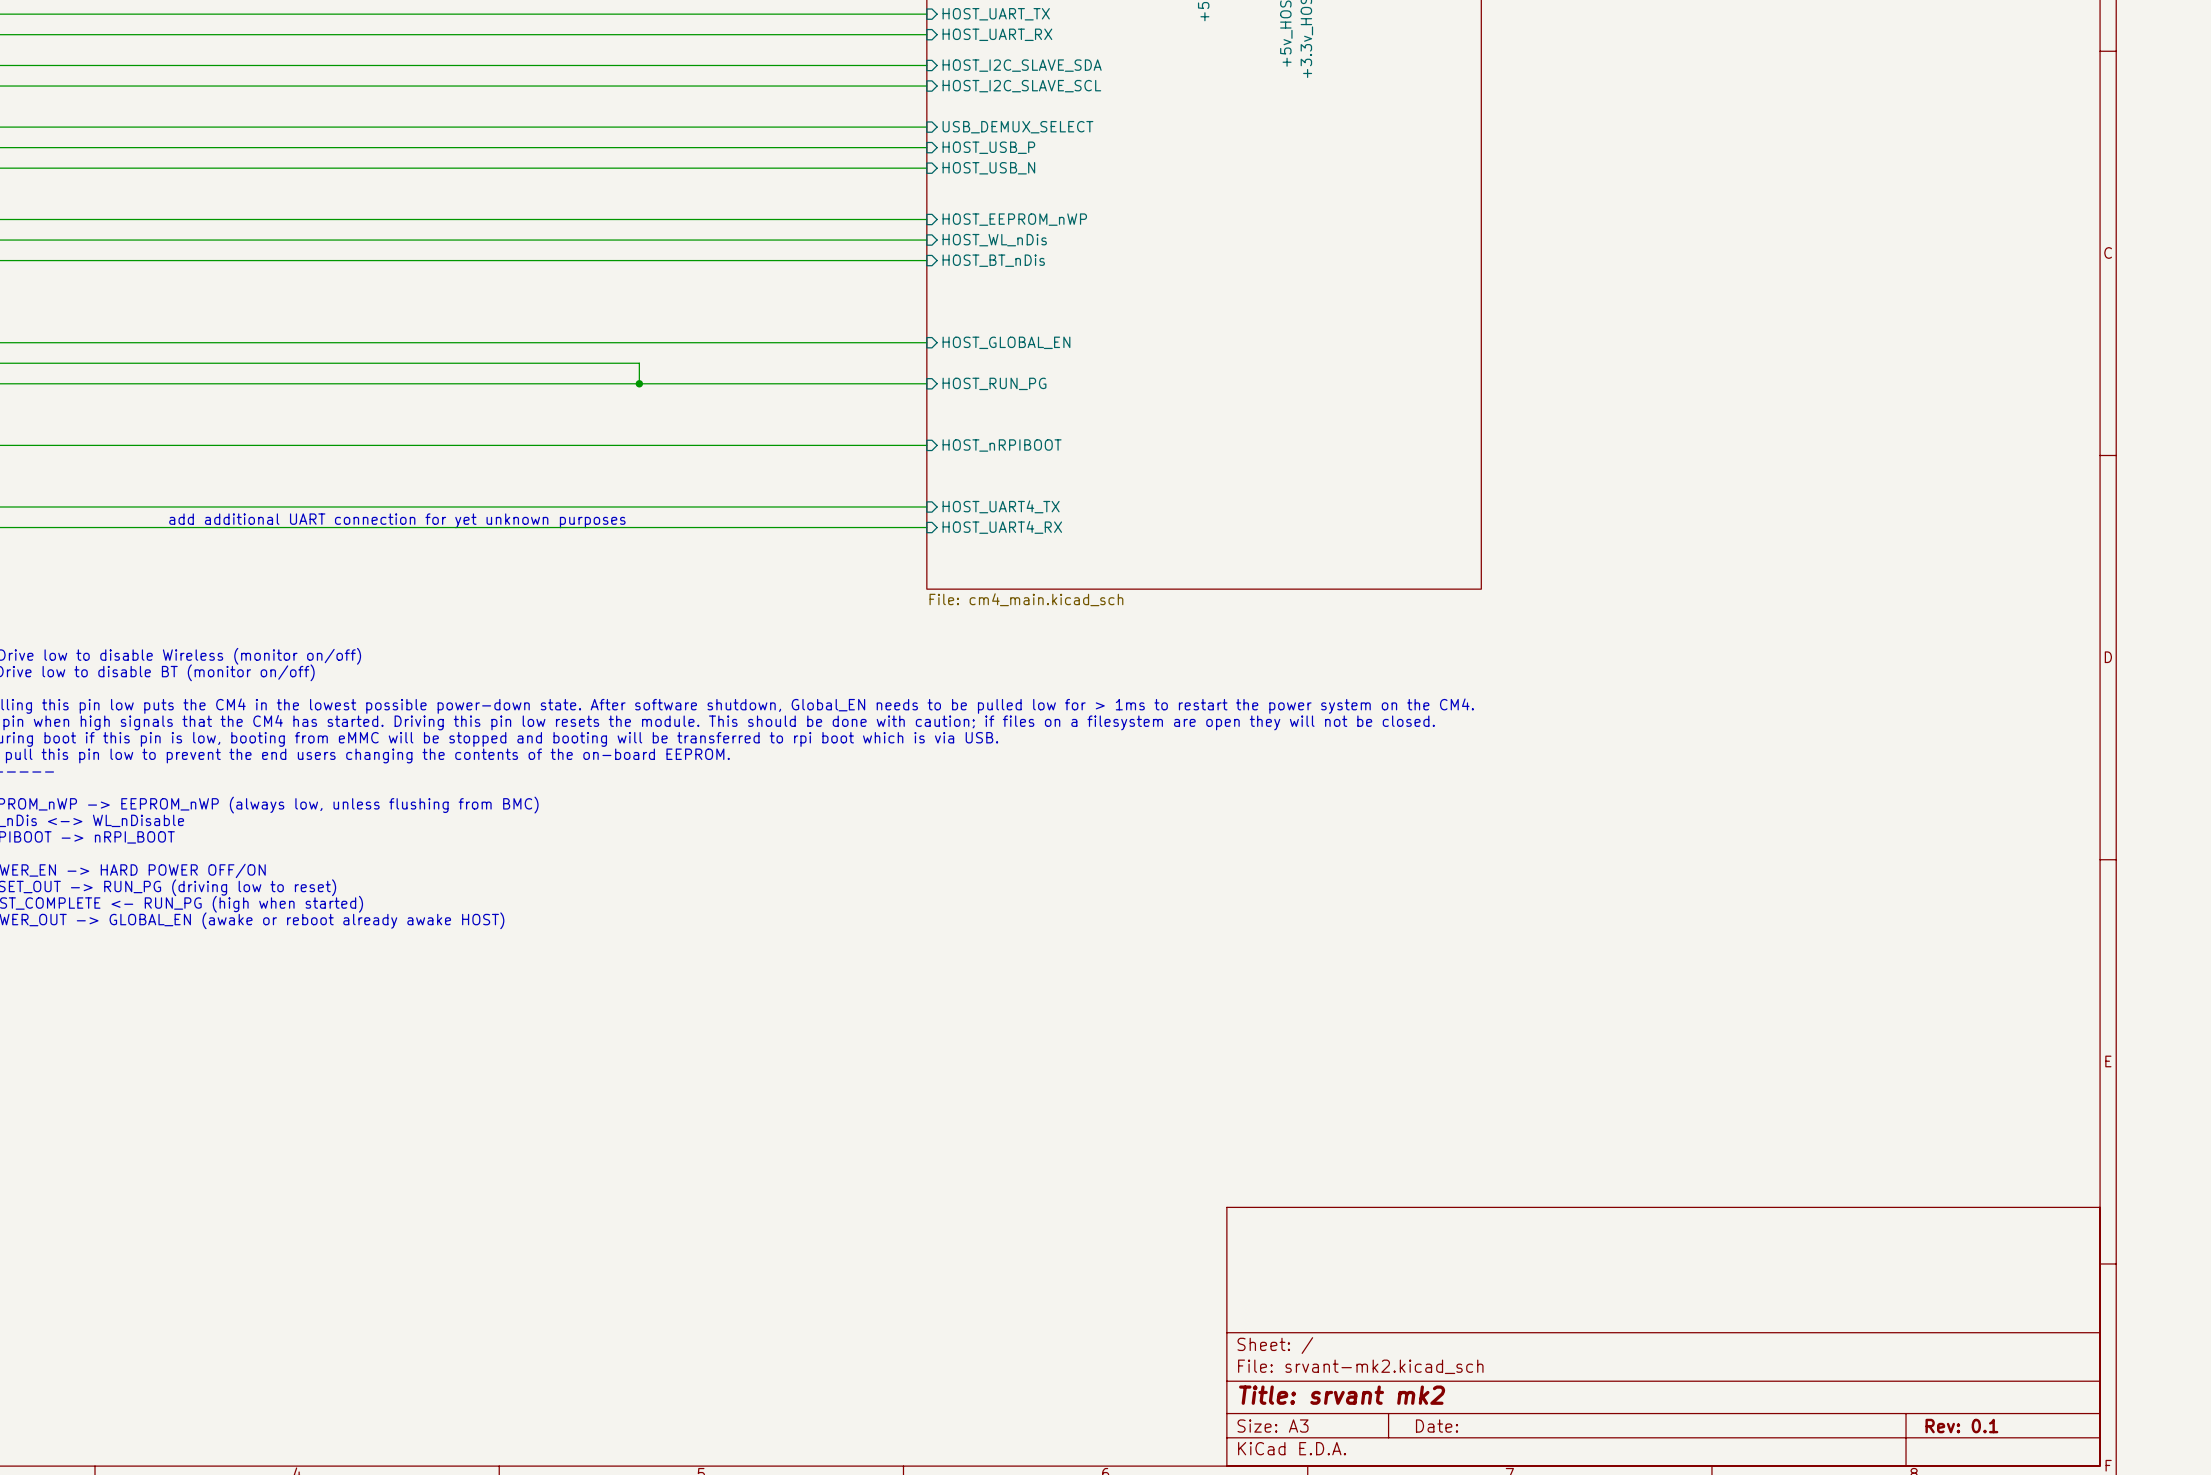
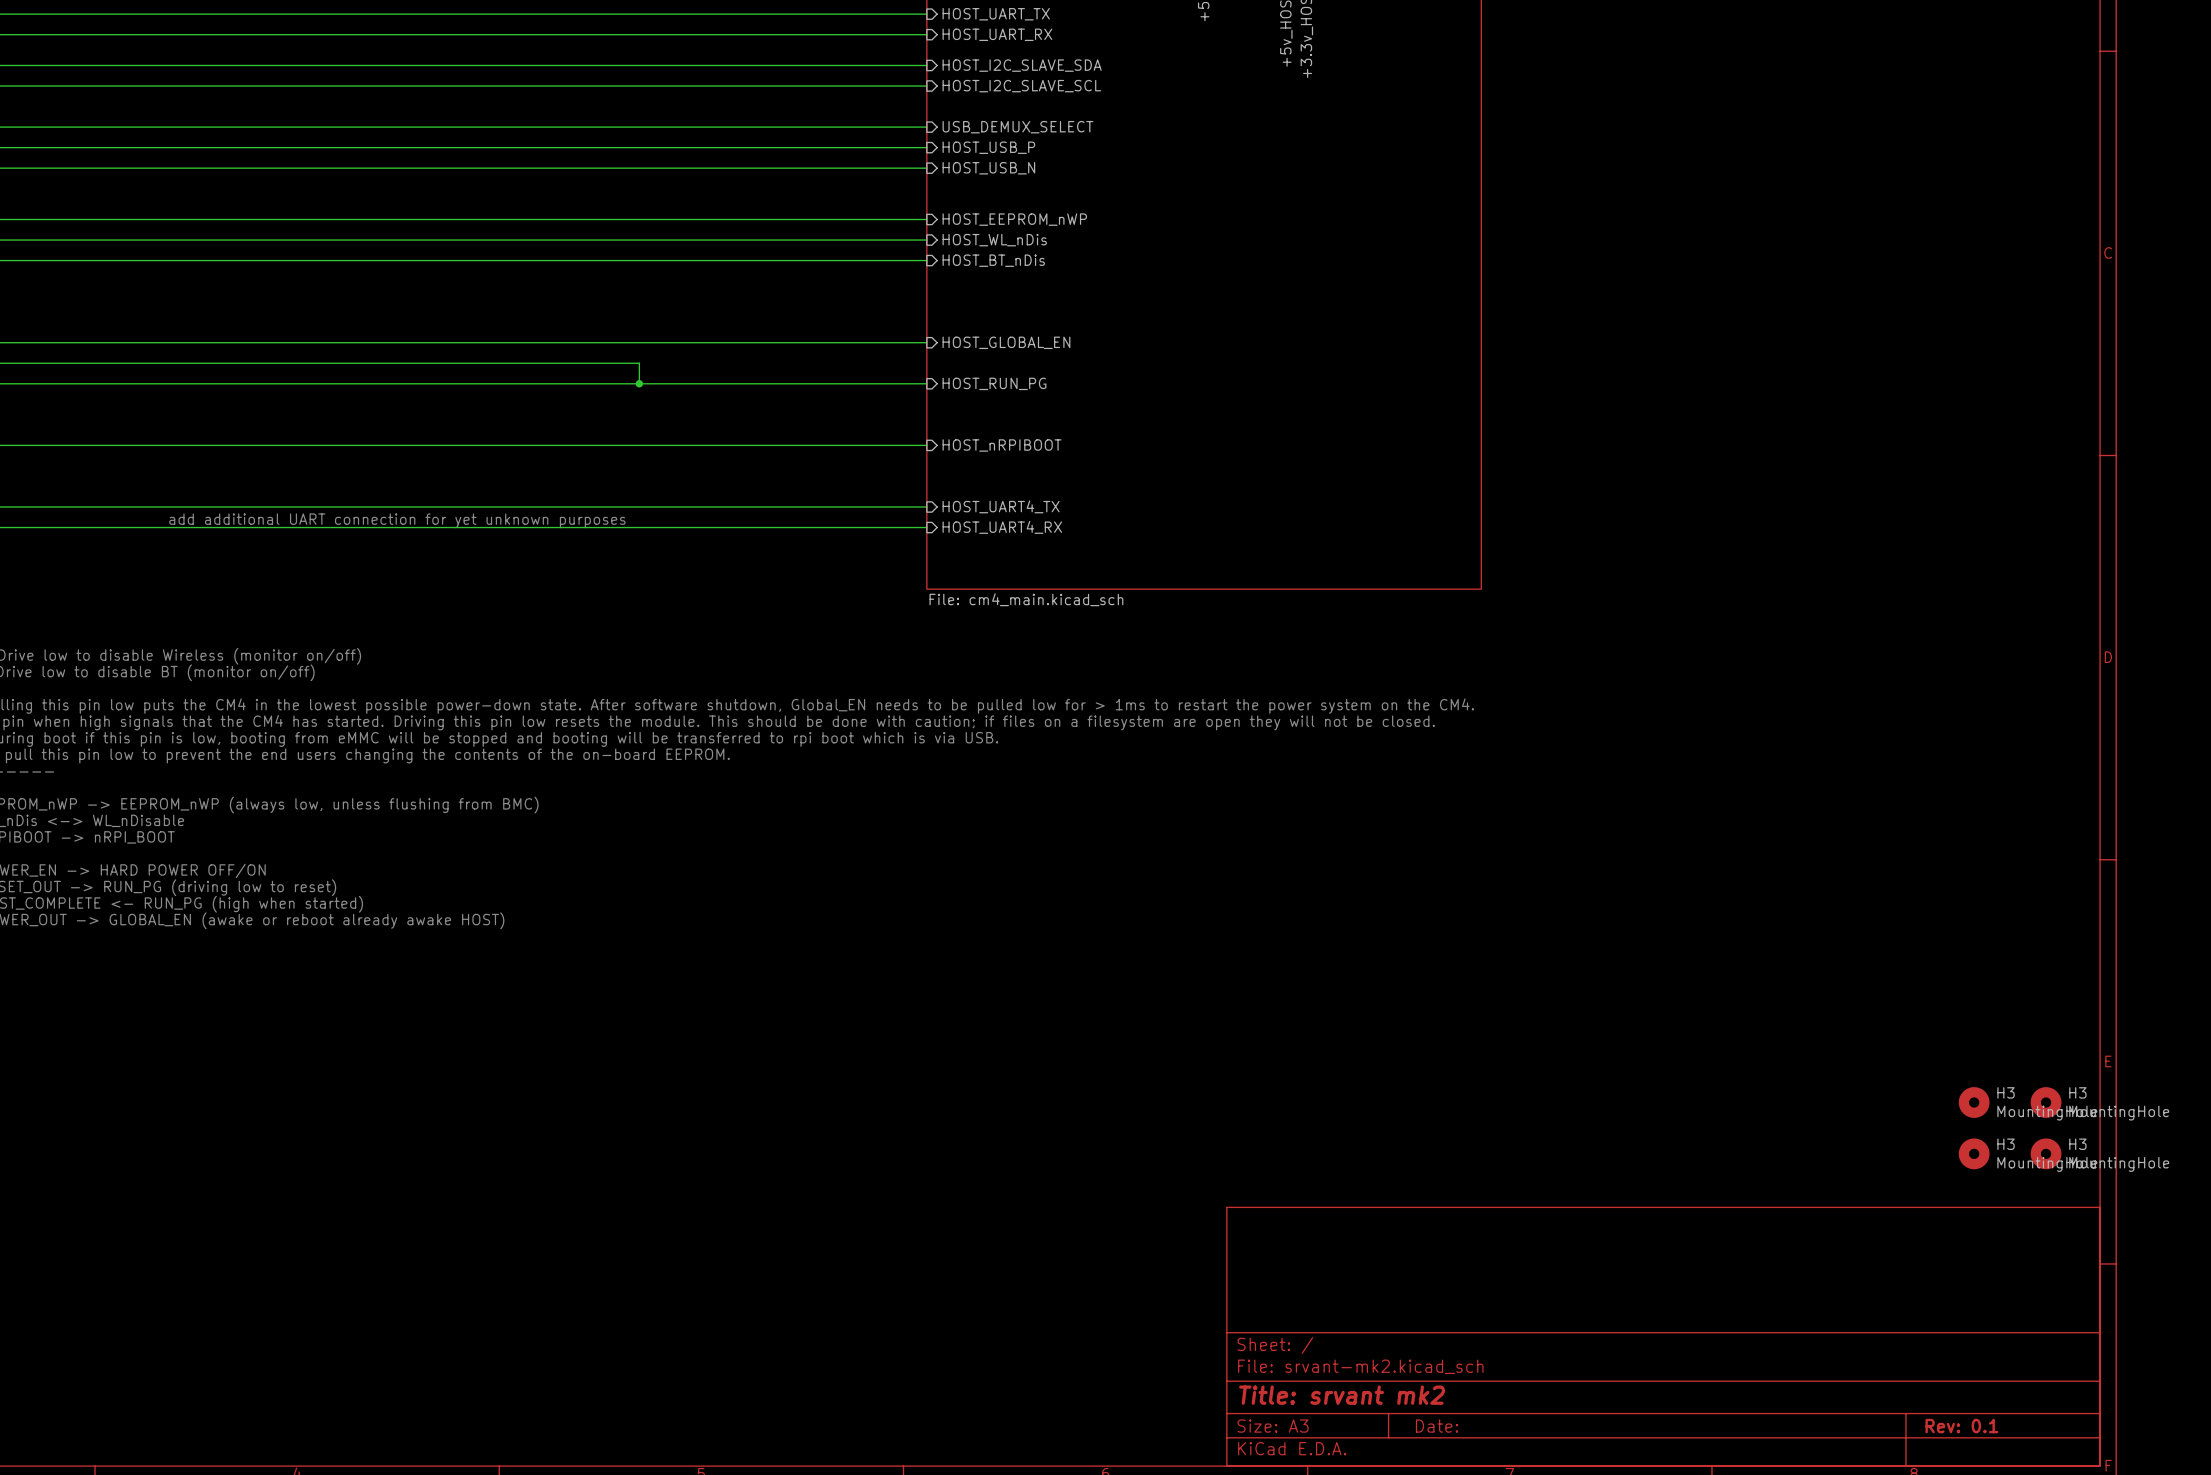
H3: none -> MountingHole (1974, 1102)
H3: none -> MountingHole (2046, 1102)
H3: none -> MountingHole (1974, 1153)
H3: none -> MountingHole (2046, 1153)

